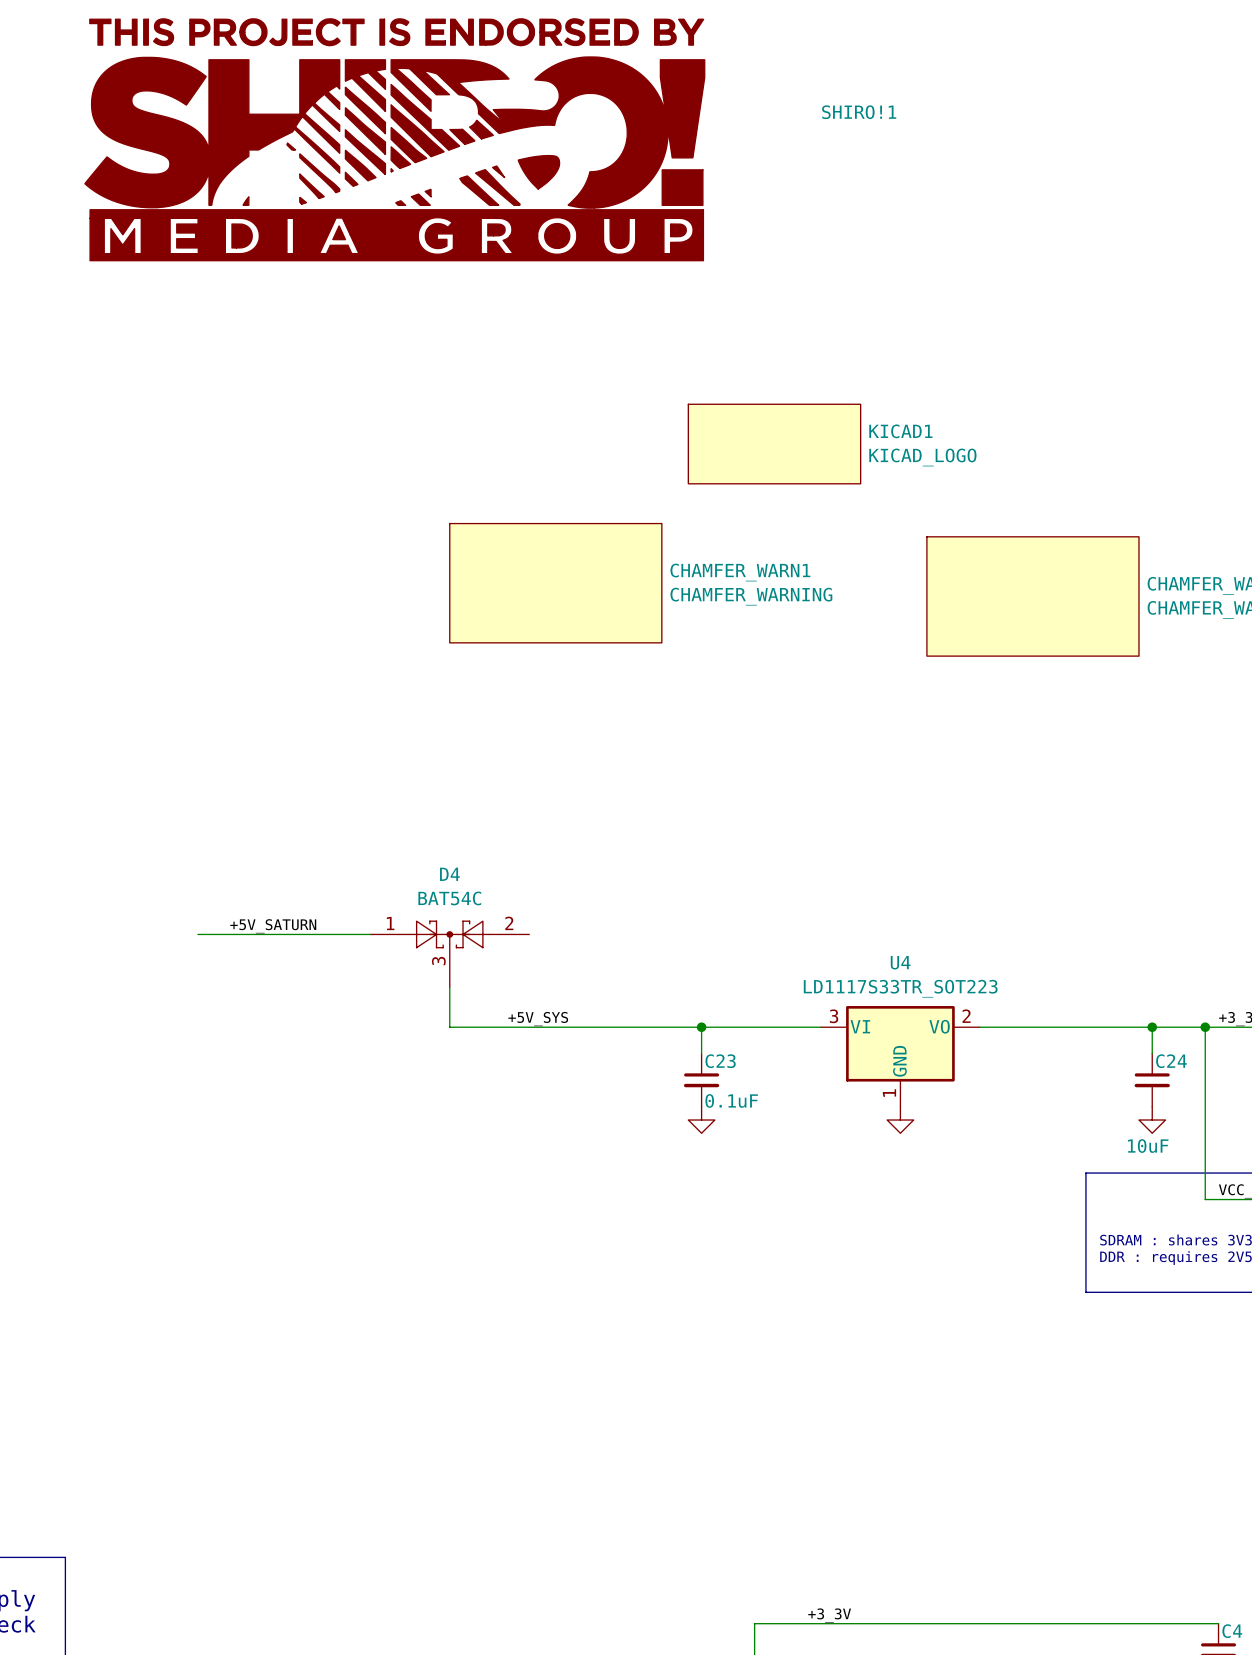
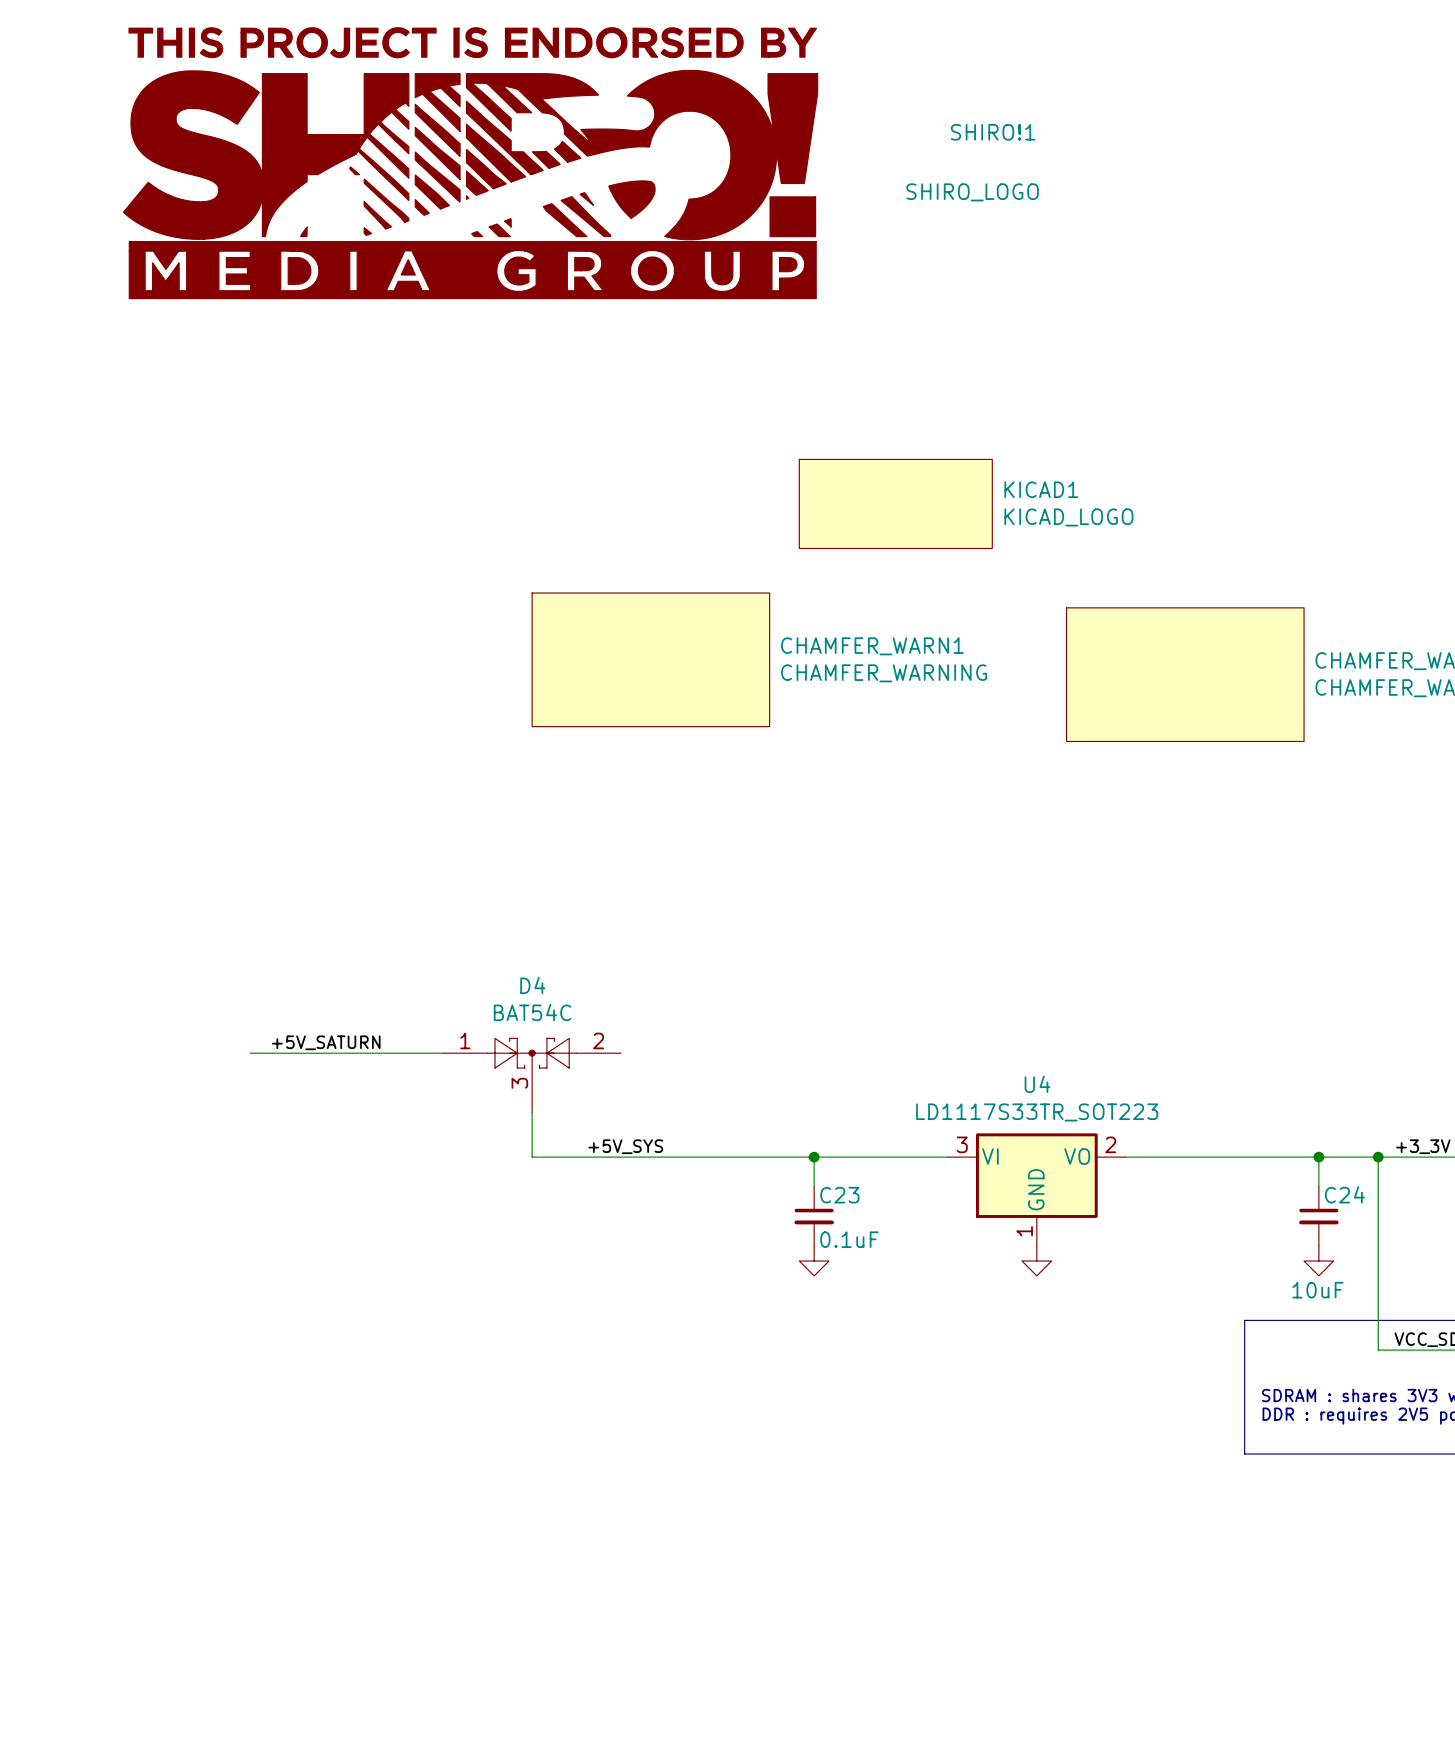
SHIRO!1 value: none -> SHIRO_LOGO (972, 192)

